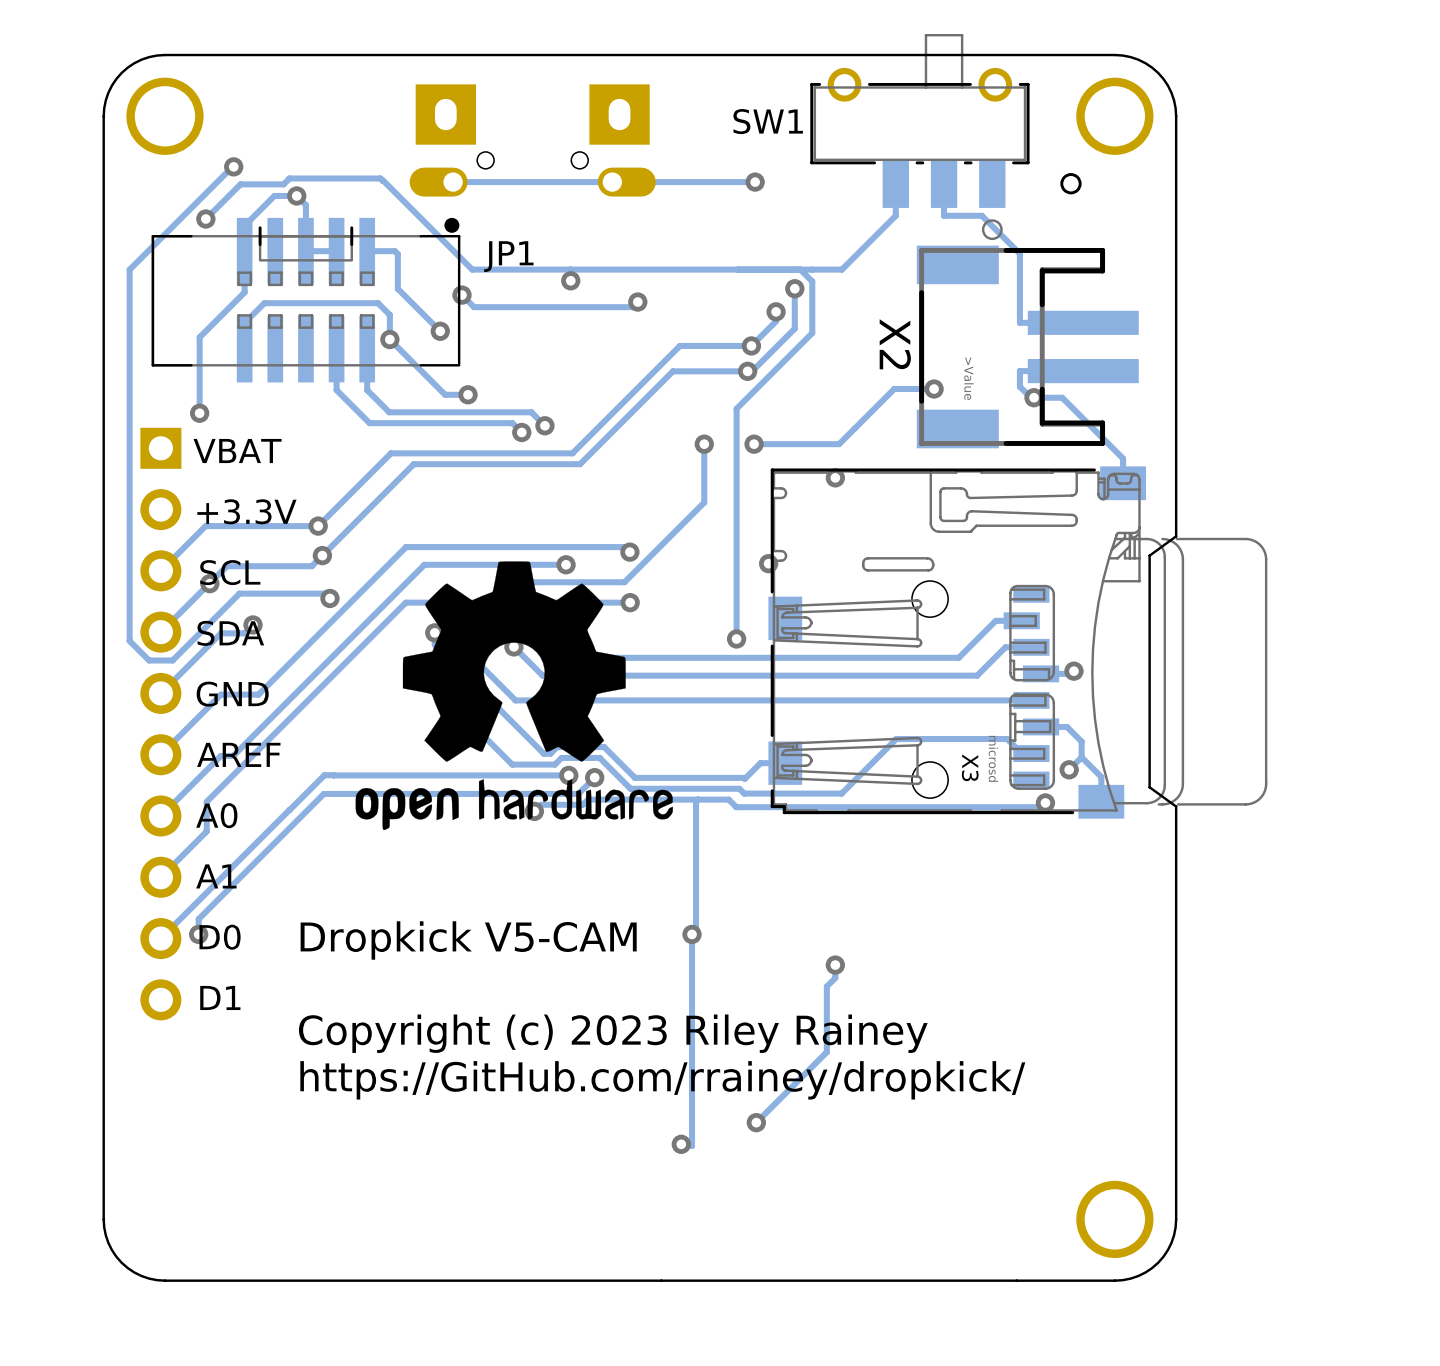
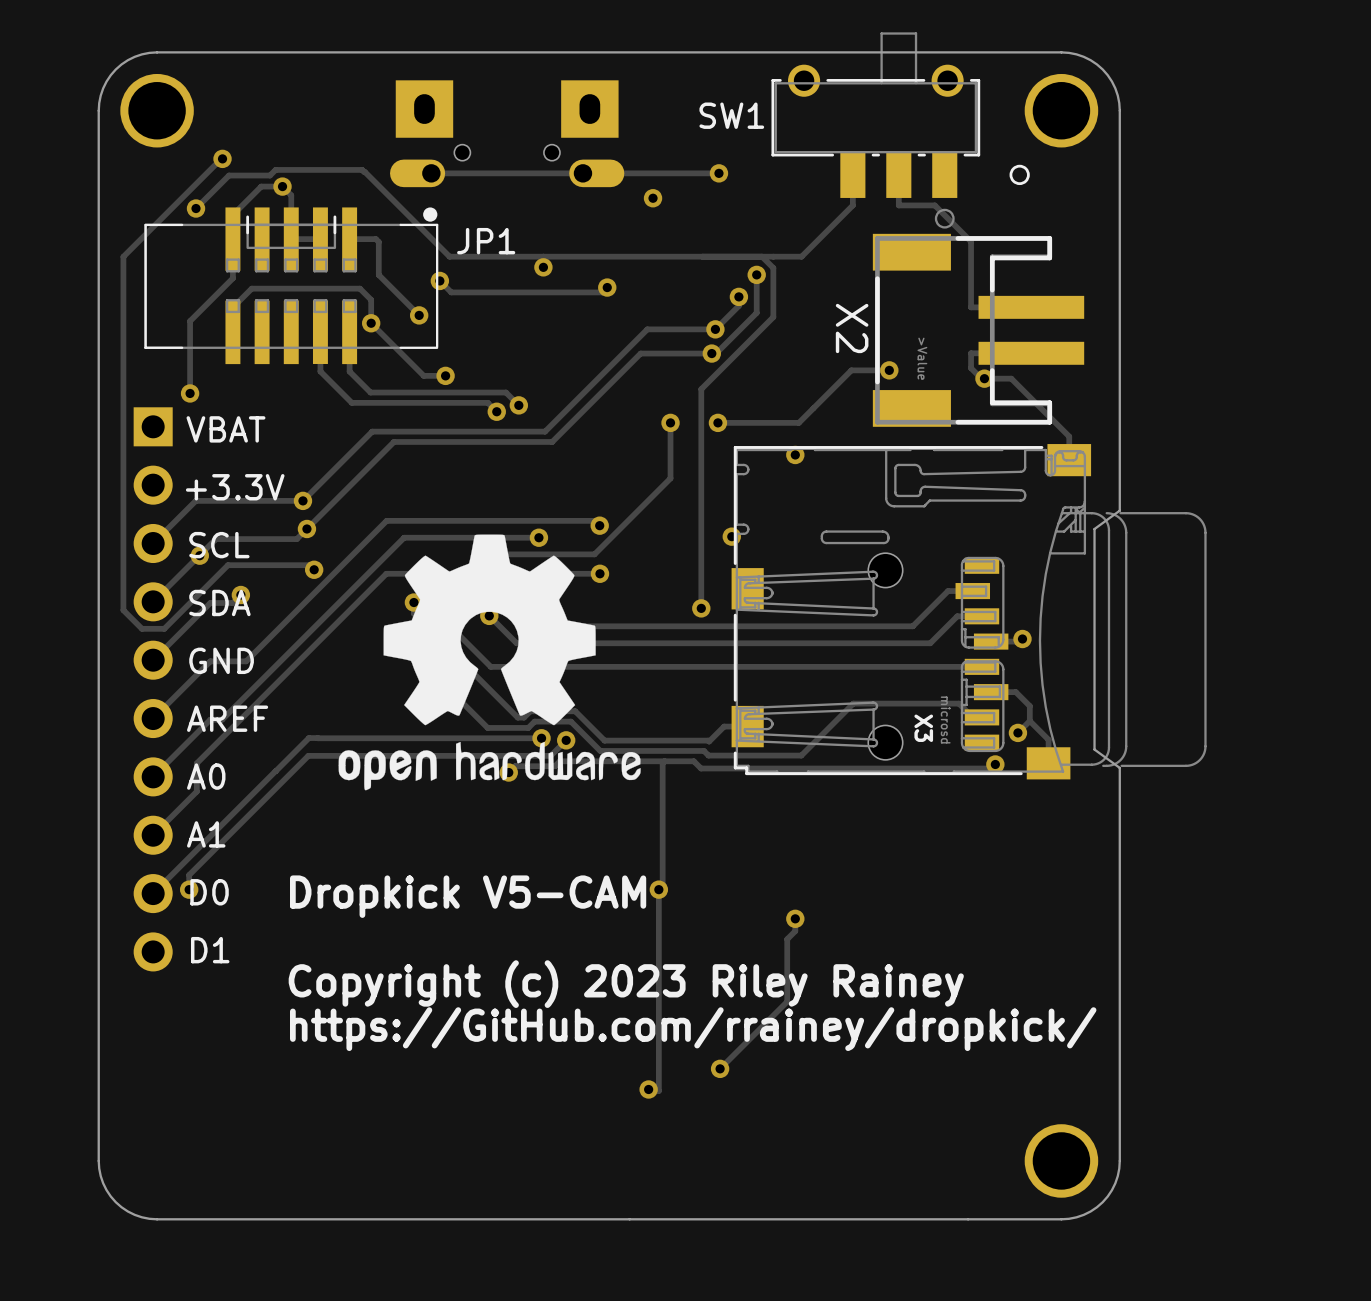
via: none -> (653, 198)

